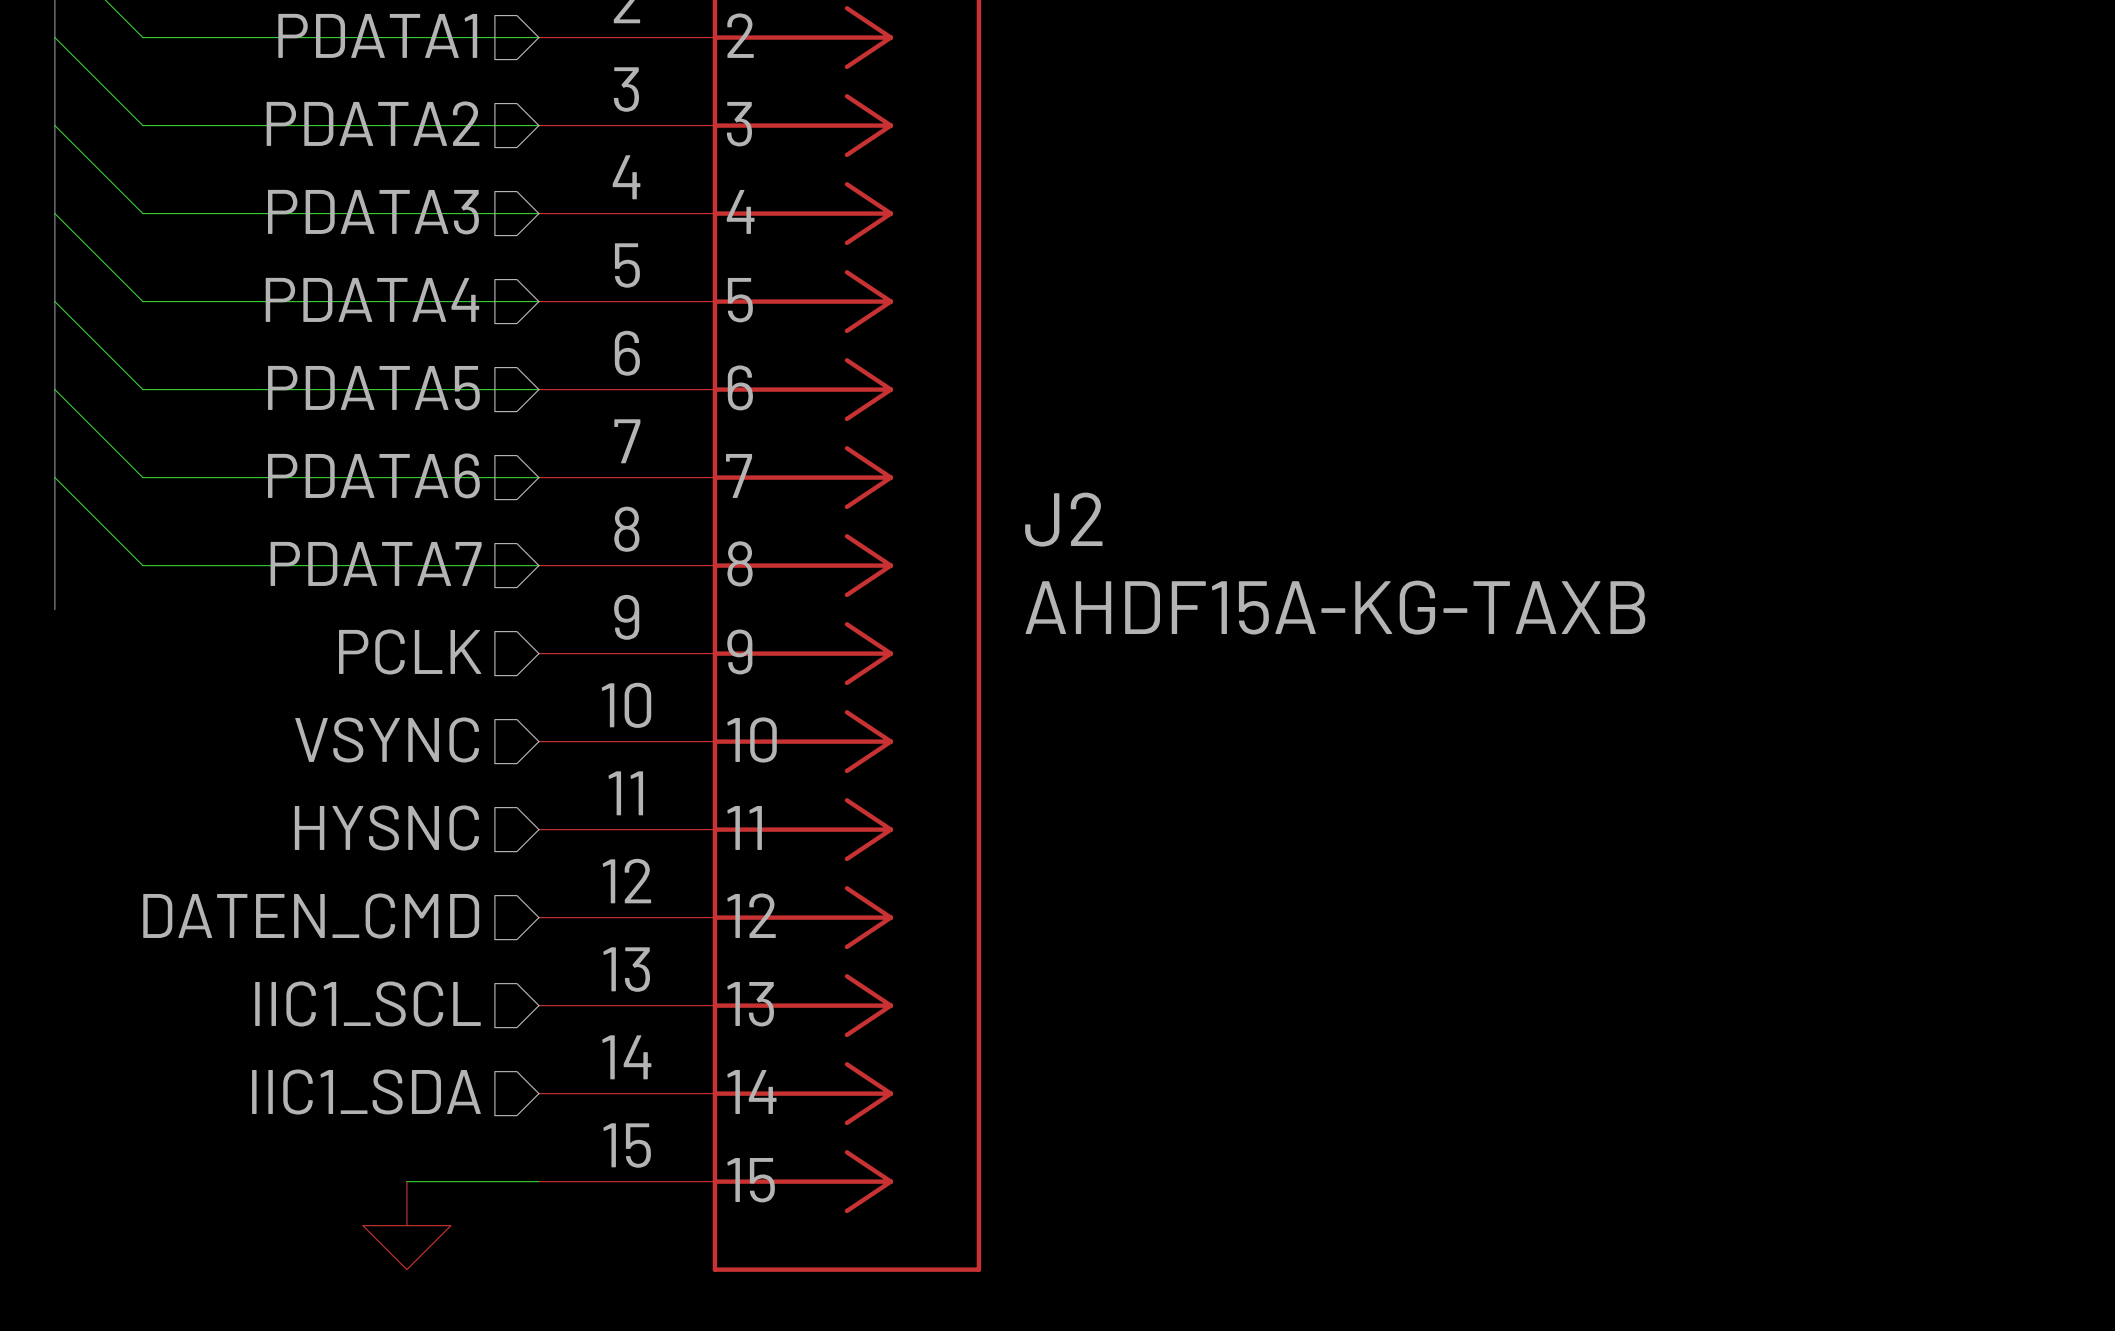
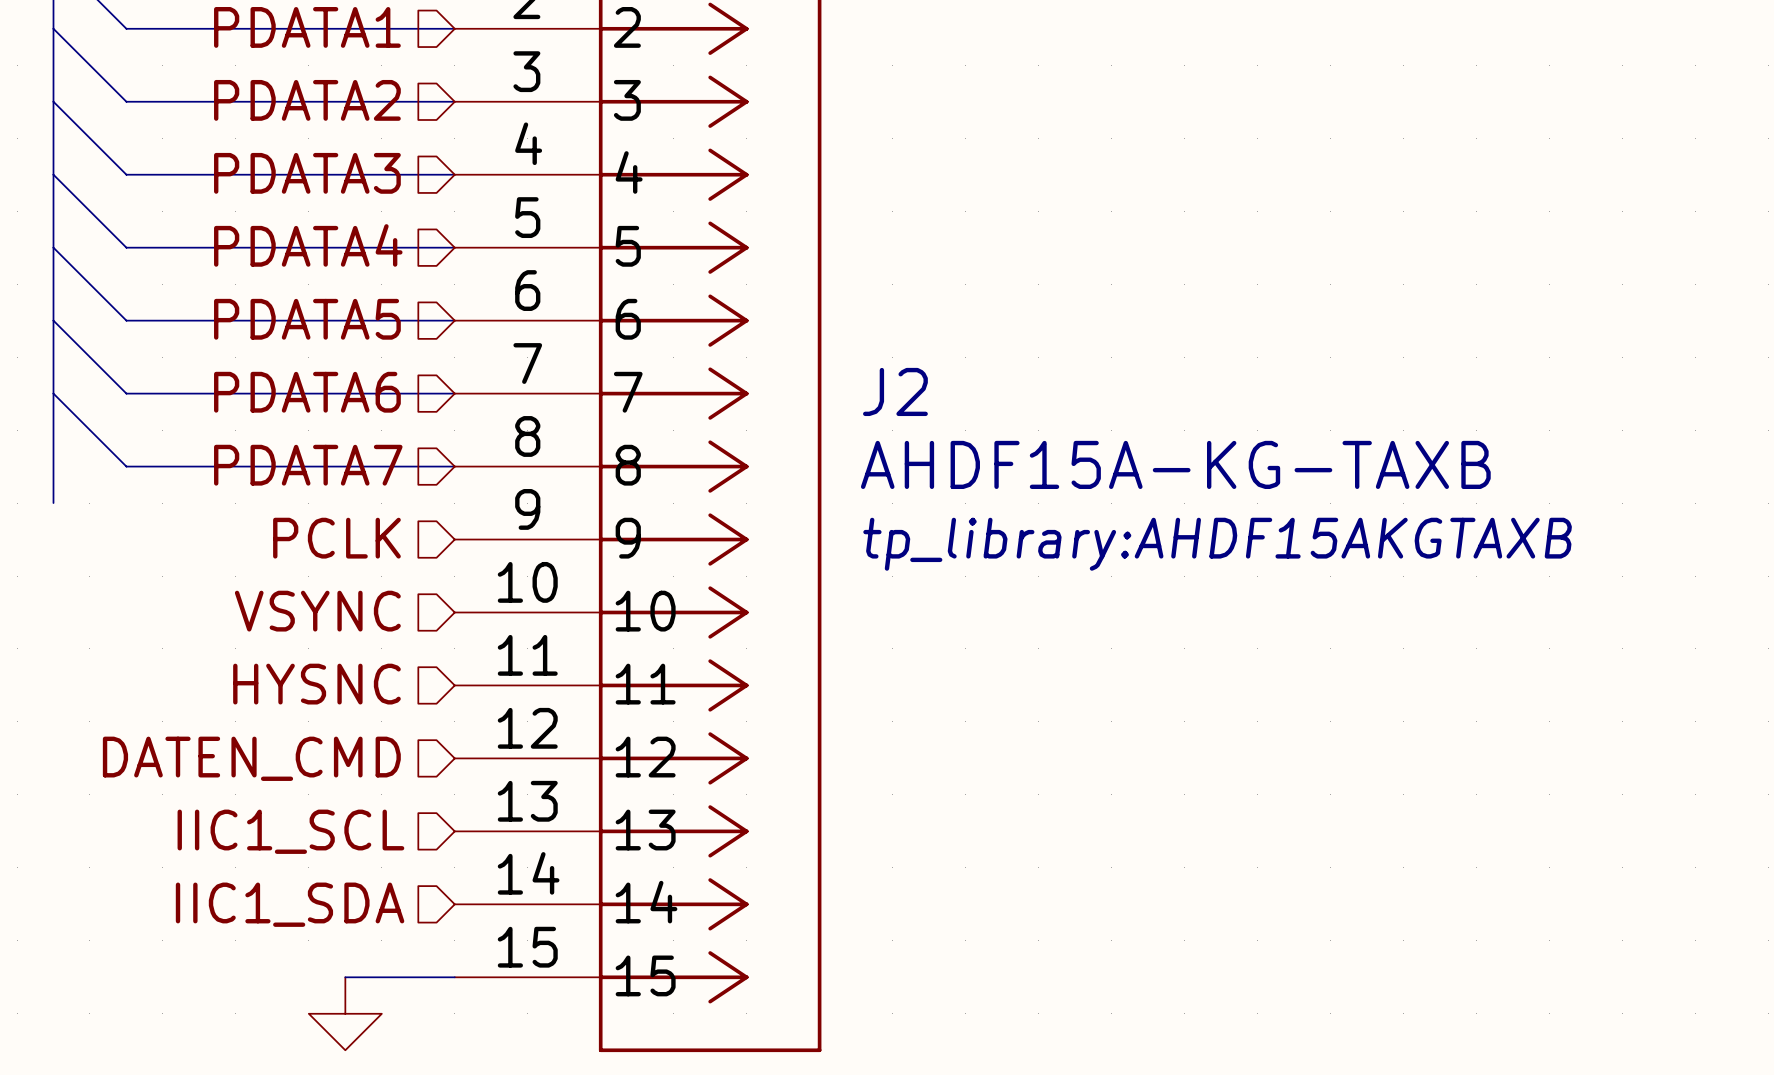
J2 name position: J2 (1063, 519) -> J2 (895, 391)
J2 value position: AHDF15A-KG-TAXB (1335, 607) -> AHDF15A-KG-TAXB (1175, 464)
J2 text: none -> tp_library:AHDF15AKGTAXB (1217, 544)

